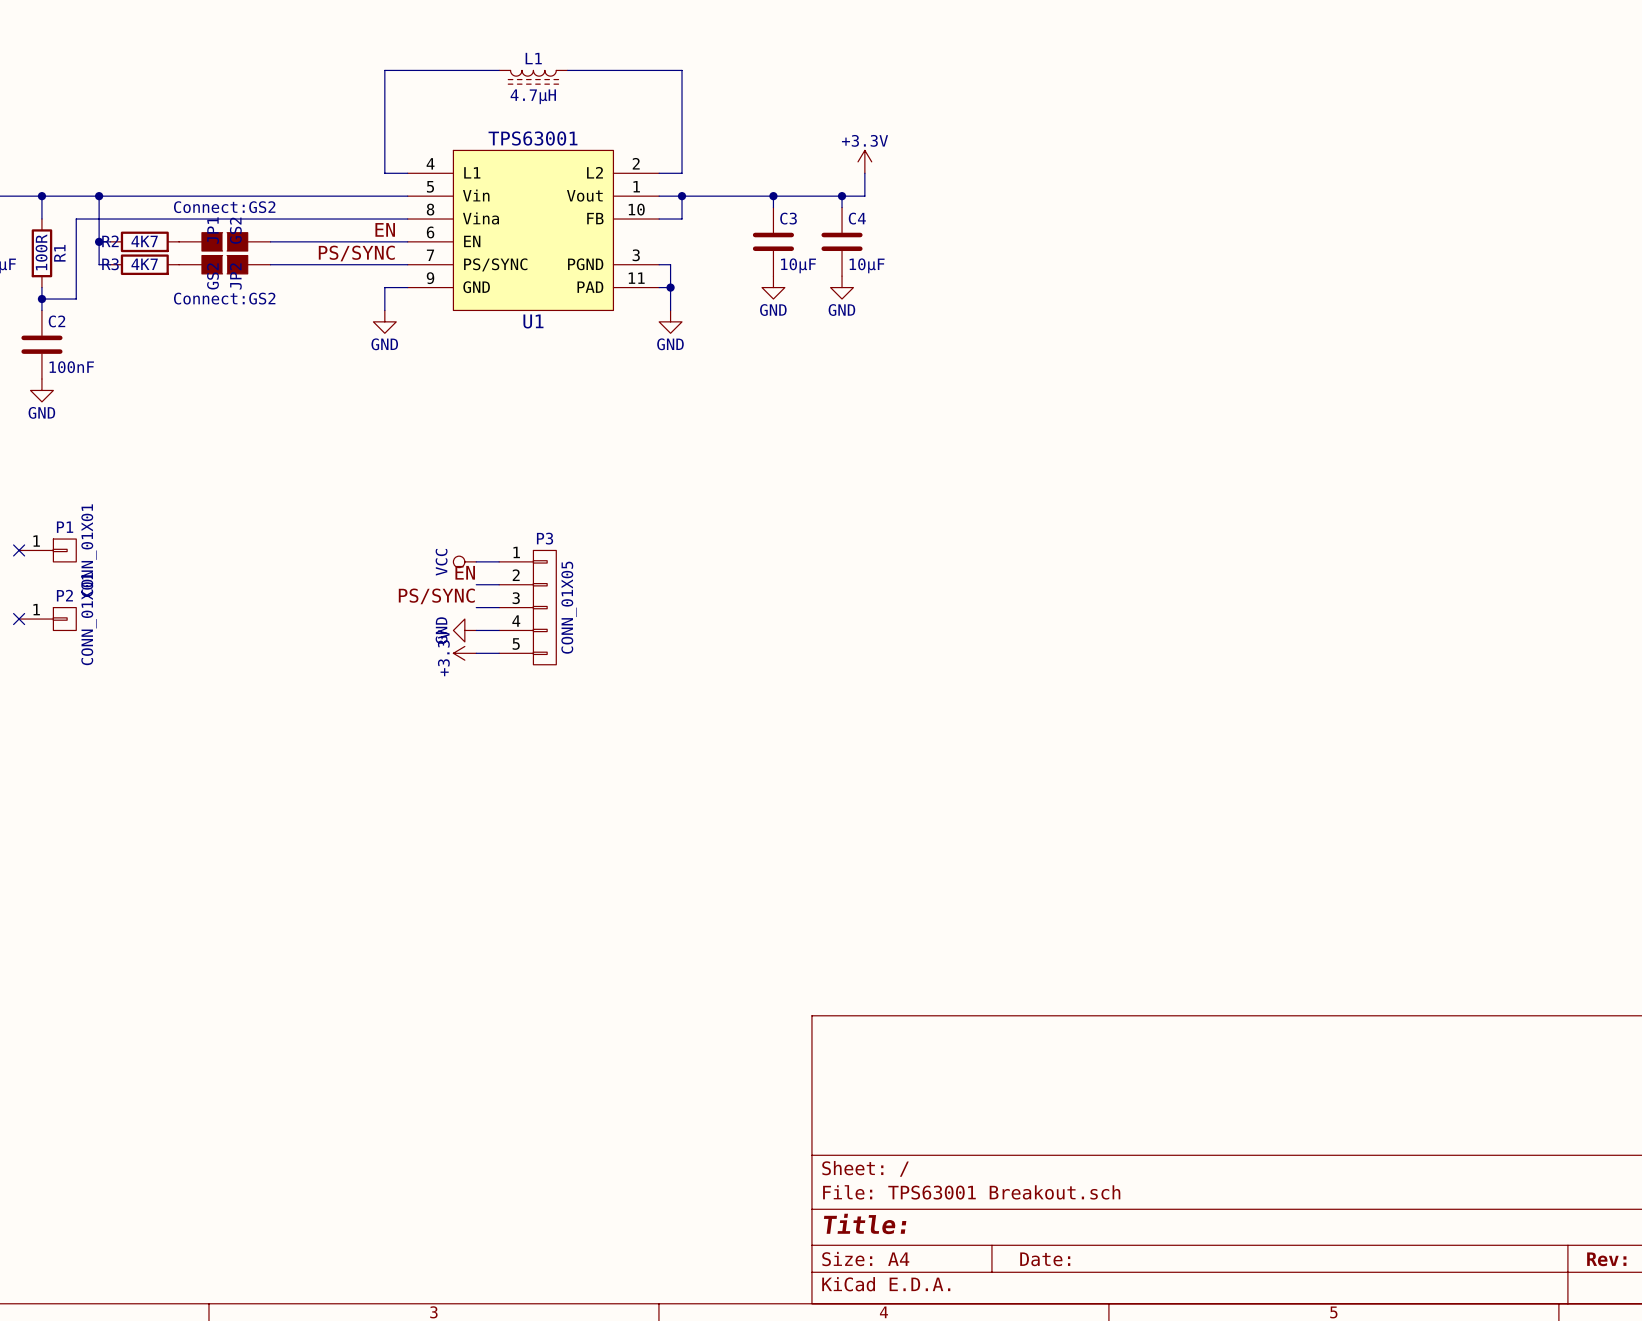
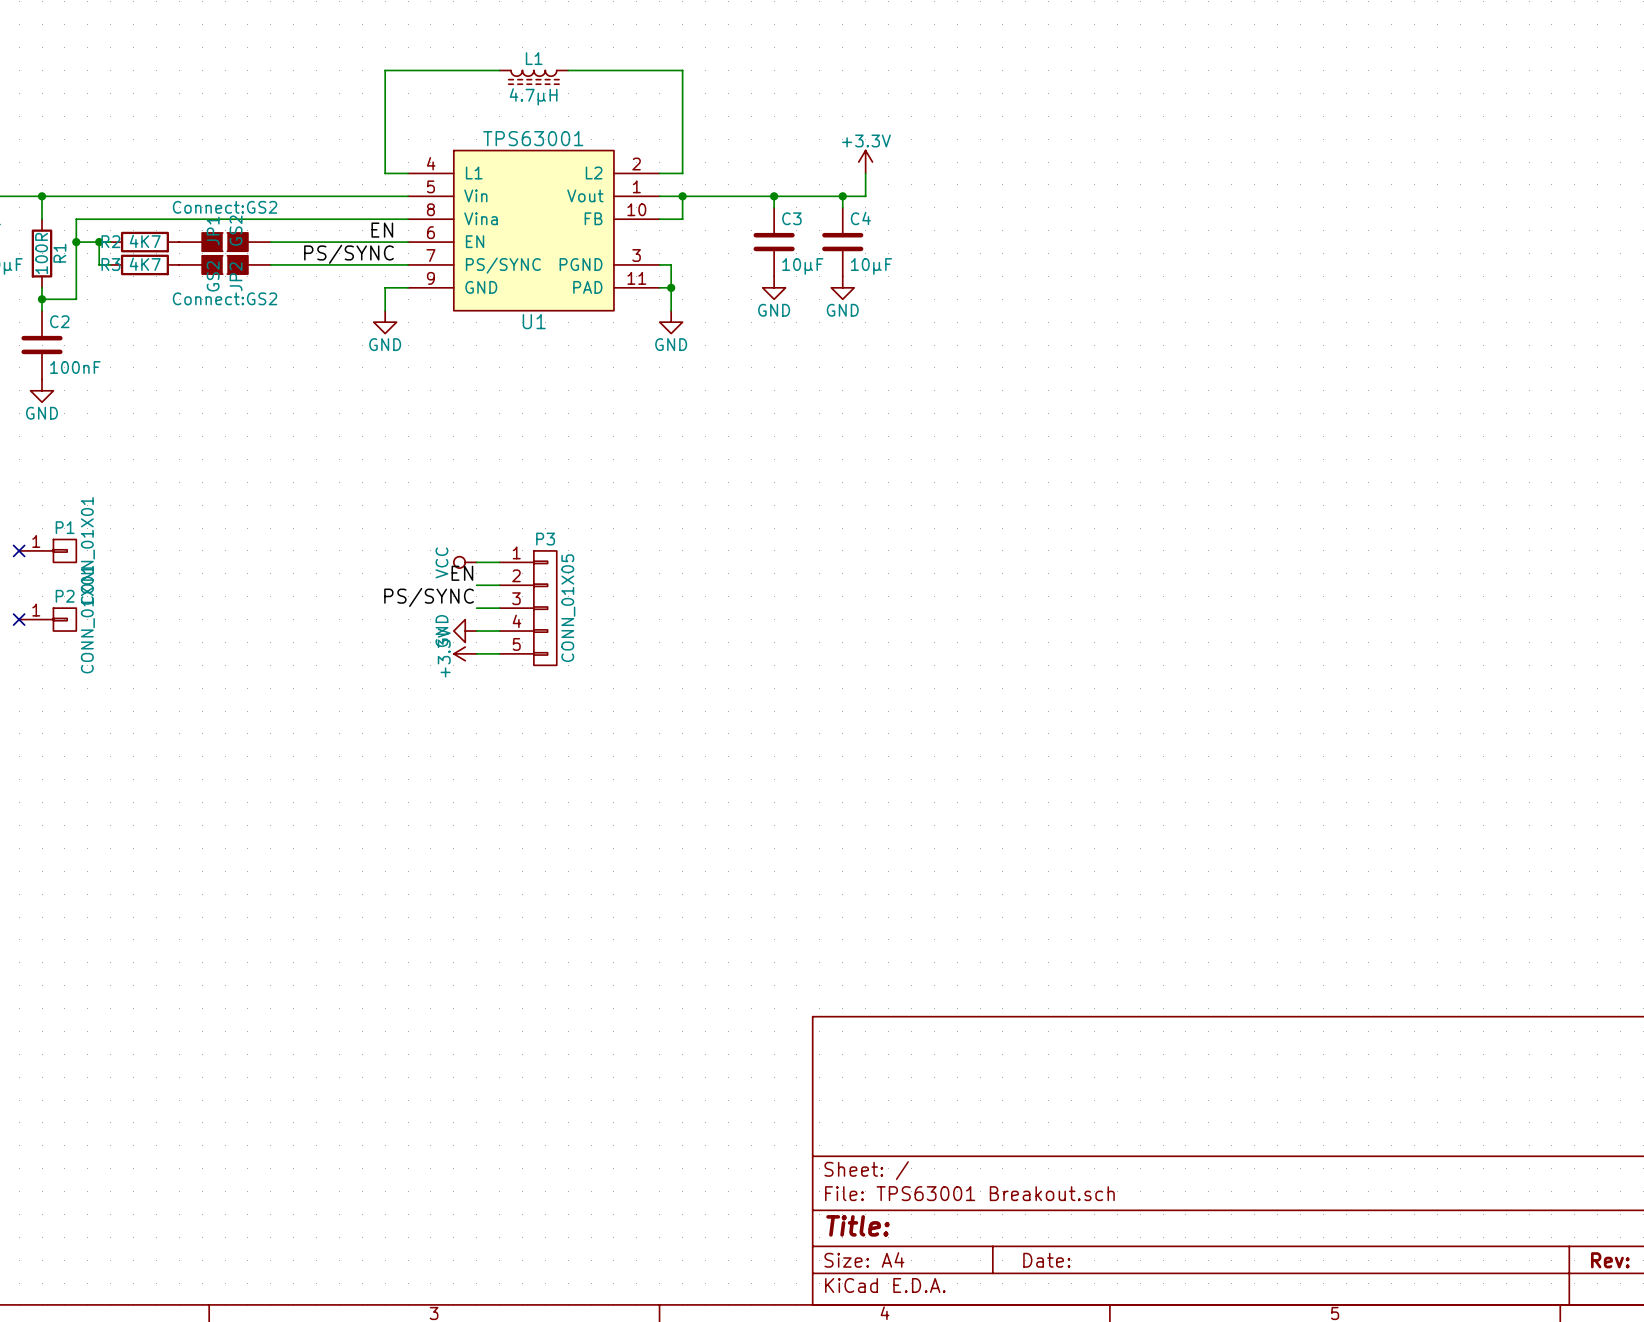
wire: (99, 196) (99, 241) -> (76, 242) (99, 242)
junction position: (99, 196) -> (76, 242)

